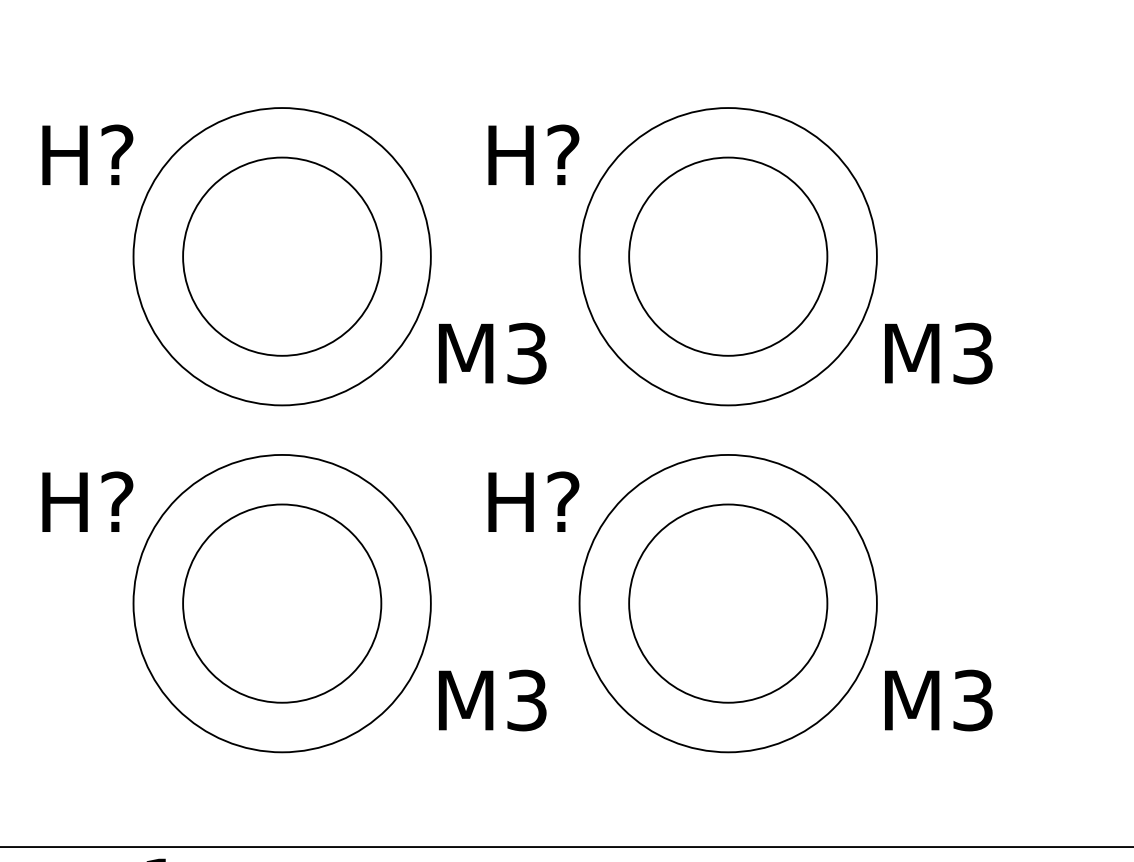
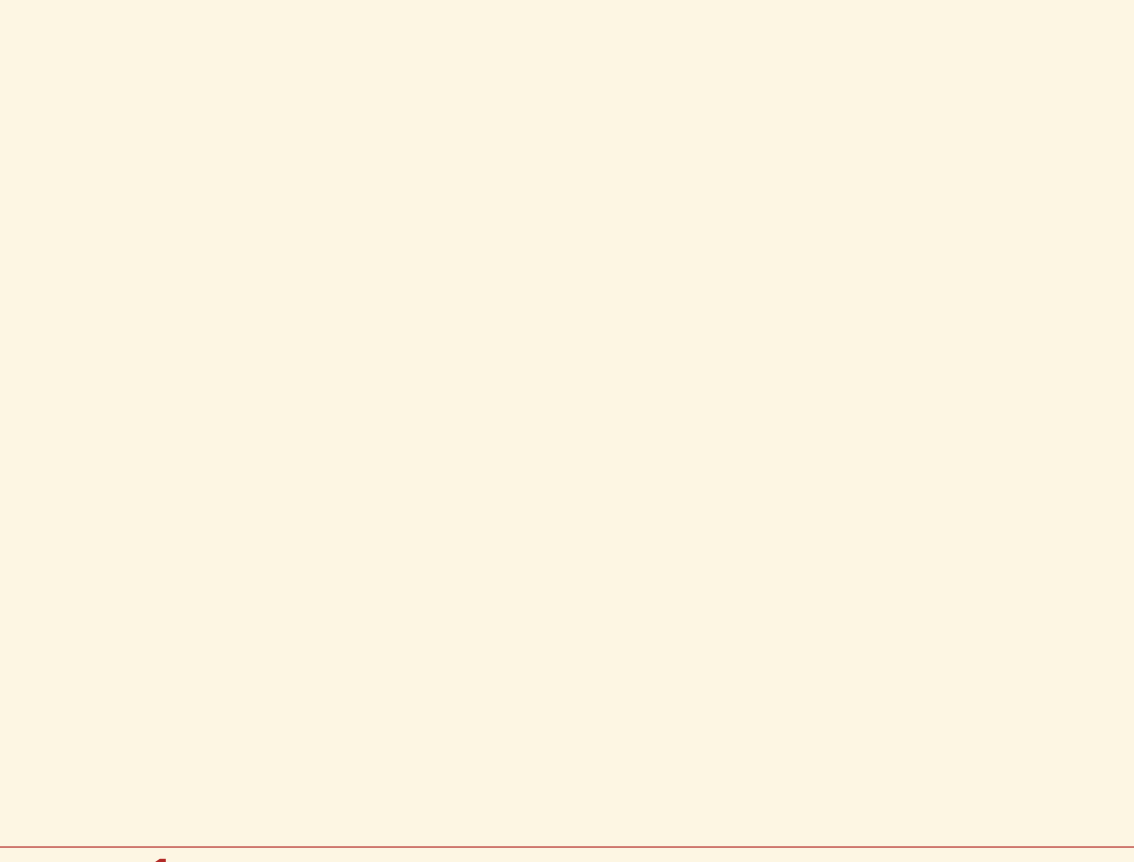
H?: M3 (282, 256) -> none
H?: M3 (728, 256) -> none
H?: M3 (282, 603) -> none
H?: M3 (728, 603) -> none

